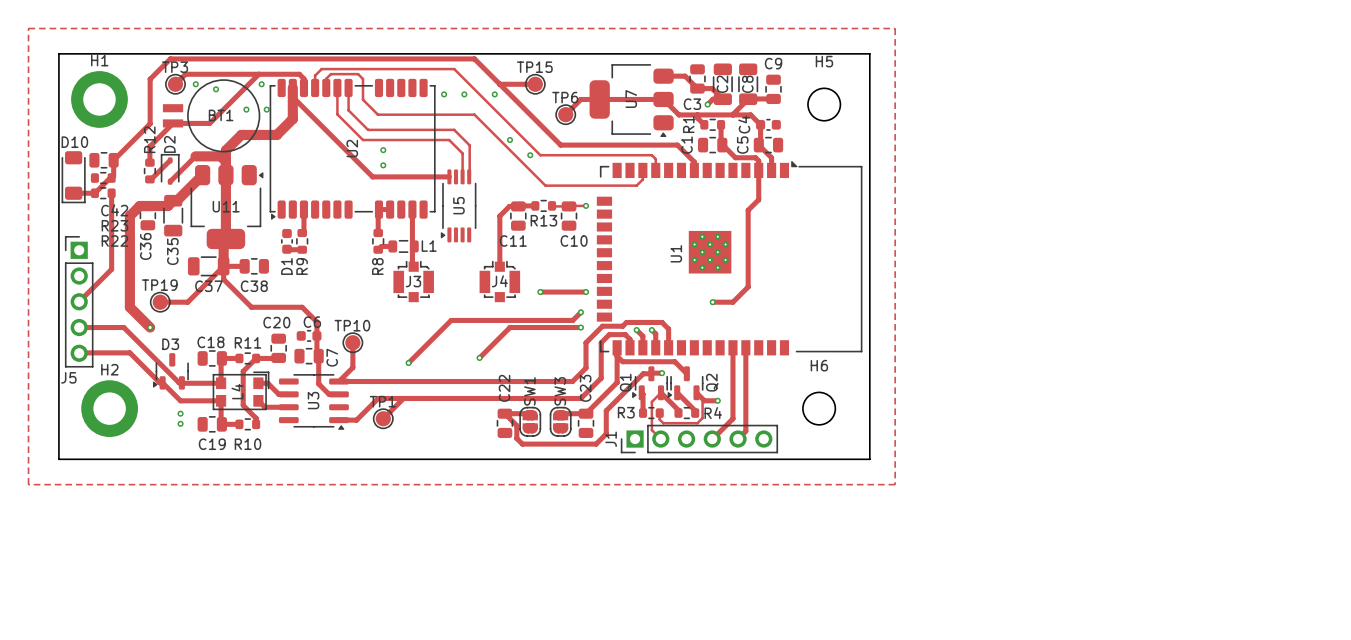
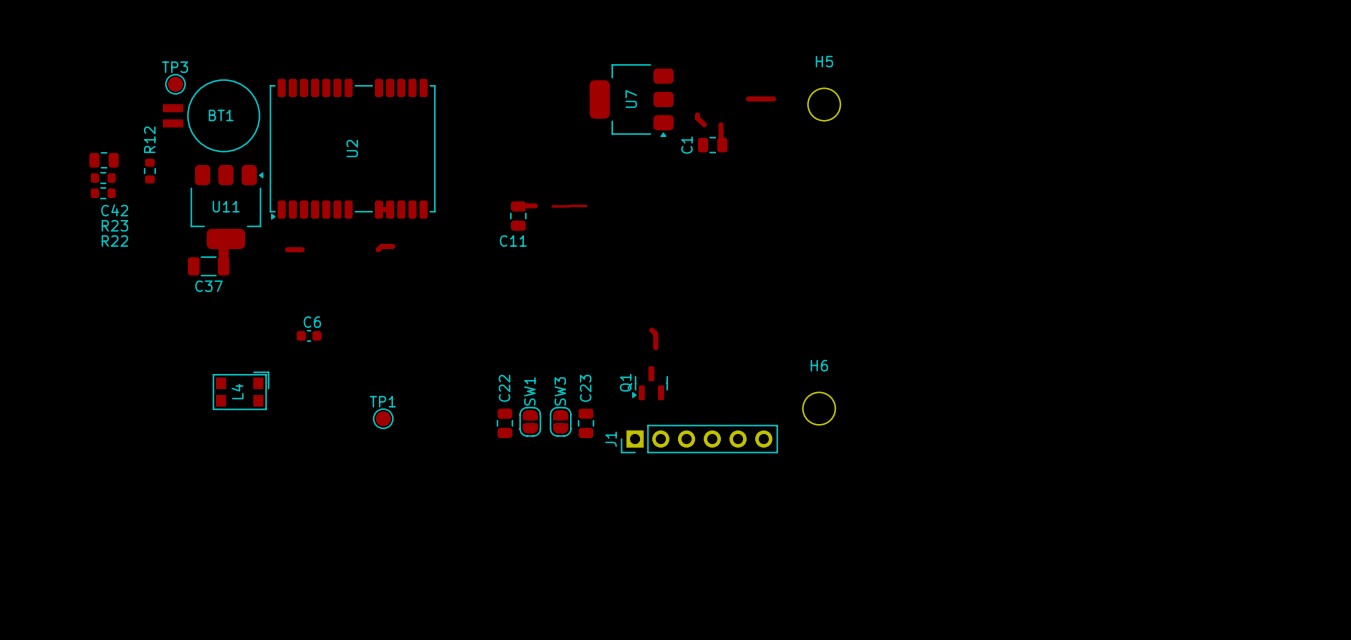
zone outline: (28, 28) (895, 28) (895, 484) (28, 484) (28, 28) -> none
board edge: (58, 53) (869, 53) (869, 459) (58, 459) (58, 53) -> none
track: (258, 74) (209, 123) (173, 123) (149, 146) (149, 162) -> none
track: (663, 76) (685, 76) (697, 88) (712, 88) (722, 99) (712, 99) (707, 104) -> none
C3: (697, 78) -> none
track: (175, 84) (185, 74) (299, 74) (303, 78) (303, 87) -> none
via: (195, 84) -> none
via: (261, 84) -> none
track: (499, 84) (535, 84) -> none
TP15: (535, 84) -> none
C2: (722, 84) -> none
C8: (748, 84) -> none
track: (315, 87) (315, 75) (321, 69) (454, 69) (540, 155) (651, 155) (655, 159) (655, 170) -> none
track: (326, 87) (326, 78) (330, 74) (358, 74) (363, 79) (363, 99) (377, 114) (474, 114) (545, 185) (636, 185) (642, 179) (642, 170) -> none
track: (337, 87) (337, 114) (363, 140) (449, 140) (462, 153) (462, 176) -> none
track: (348, 87) (348, 110) (368, 129) (454, 129) (469, 145) (469, 176) -> none
via: (216, 89) -> none
C9: (773, 89) -> none
via: (444, 94) -> none
via: (464, 94) -> none
via: (494, 94) -> none
H1: (99, 99) -> none
track: (748, 99) (732, 114) -> none
via: (707, 104) -> none
via: (246, 109) -> none
via: (266, 109) -> none
track: (565, 114) (580, 99) (663, 99) (679, 114) (750, 114) (760, 124) (760, 143) -> none
TP6: (565, 114) -> none
R1: (712, 124) -> none
C4: (768, 124) -> none
via: (509, 140) -> none
track: (722, 145) (735, 157) (755, 157) (758, 161) (758, 199) (748, 210) (748, 286) (732, 302) (712, 302) -> none
track: (758, 145) (771, 157) (771, 170) -> none
C5: (768, 145) -> none
via: (383, 150) -> none
via: (530, 155) -> none
track: (170, 160) (151, 179) -> none
track: (225, 161) (220, 156) (195, 156) (170, 181) -> none
via: (383, 165) -> none
D2: (170, 169) -> none
track: (694, 170) (694, 162) (677, 145) (560, 145) (474, 58) (170, 58) (150, 79) (150, 123) (113, 160) (113, 176) (111, 178) -> none
track: (202, 175) (177, 200) -> none
track: (449, 176) (372, 176) (292, 97) (292, 87) (292, 118) (276, 134) (241, 134) (225, 150) (225, 238) -> none
D10: (73, 177) -> none
track: (110, 178) (94, 193) (73, 193) -> none
track: (111, 193) (111, 269) (79, 301) -> none
track: (173, 200) (167, 206) (139, 206) (129, 216) (129, 307) (150, 327) -> none
U5: (458, 205) -> none
R13: (543, 205) -> none
via: (586, 205) -> none
track: (518, 206) (509, 206) (499, 216) (499, 266) -> none
track: (303, 209) (303, 231) (302, 233) -> none
track: (412, 209) (412, 265) -> none
track: (378, 210) (378, 233) -> none
C36: (147, 215) -> none
C35: (173, 215) -> none
C10: (569, 216) -> none
D1: (286, 241) -> none
R9: (302, 241) -> none
R8: (378, 241) -> none
L1: (403, 246) -> none
U1: (729, 258) -> none
track: (223, 266) (244, 266) -> none
track: (223, 266) (187, 302) (160, 302) -> none
track: (223, 266) (223, 279) (251, 307) (302, 307) (316, 322) (318, 383) (329, 394) (338, 394) -> none
C38: (254, 266) -> none
J3: (413, 281) -> none
J4: (499, 281) -> none
track: (540, 292) (586, 292) -> none
via: (540, 292) -> none
via: (586, 292) -> none
J5: (79, 301) -> none
TP19: (160, 302) -> none
via: (712, 302) -> none
track: (580, 312) (572, 320) (451, 320) (408, 363) -> none
via: (580, 312) -> none
track: (79, 327) (123, 327) (179, 382) (181, 382) -> none
via: (150, 327) -> none
track: (580, 327) (509, 327) (479, 357) -> none
via: (580, 327) -> none
track: (636, 330) (642, 336) (642, 347) -> none
via: (636, 330) -> none
via: (651, 330) -> none
track: (352, 342) (352, 367) (338, 381) (572, 381) (586, 368) (586, 342) (602, 326) (622, 326) (626, 322) (662, 322) (668, 329) (668, 347) -> none
TP10: (352, 342) -> none
track: (617, 347) (617, 382) (586, 413) (562, 413) -> none
track: (629, 347) (629, 339) (625, 334) (609, 334) (601, 342) (601, 378) (580, 398) (378, 398) (356, 420) (338, 420) -> none
track: (732, 347) (732, 418) (712, 439) -> none
track: (745, 347) (745, 431) (738, 439) -> none
C20: (278, 348) -> none
track: (79, 352) (129, 352) (180, 400) (221, 400) (221, 423) -> none
C7: (309, 356) -> none
track: (617, 356) (622, 361) (674, 361) (686, 373) -> none
via: (479, 357) -> none
C18: (212, 358) -> none
track: (221, 358) (239, 358) -> none
R11: (247, 358) -> none
track: (278, 358) (256, 358) (243, 371) (243, 405) (256, 418) (256, 424) -> none
track: (221, 359) (221, 383) (182, 383) -> none
via: (408, 363) -> none
D3: (170, 371) -> none
track: (662, 373) (643, 373) (606, 410) (606, 433) (596, 444) (522, 444) (516, 438) (516, 425) (504, 413) (528, 413) -> none
via: (662, 373) -> none
track: (258, 383) (267, 383) (278, 394) (288, 394) -> none
Q2: (685, 383) -> none
track: (641, 392) (643, 413) -> none
track: (677, 392) (695, 410) -> none
track: (403, 398) (383, 418) -> none
track: (258, 400) (264, 407) (288, 407) -> none
track: (717, 400) (704, 400) (696, 392) (702, 398) (702, 418) (697, 423) (663, 423) (659, 419) (659, 413) -> none
via: (717, 400) -> none
U3: (313, 402) -> none
H2: (109, 408) -> none
via: (180, 413) -> none
R3: (651, 413) -> none
track: (678, 413) (678, 410) (661, 392) (651, 401) (651, 430) (660, 439) -> none
R4: (686, 413) -> none
via: (180, 423) -> none
C19: (212, 424) -> none
track: (221, 424) (239, 424) -> none
R10: (247, 424) -> none

